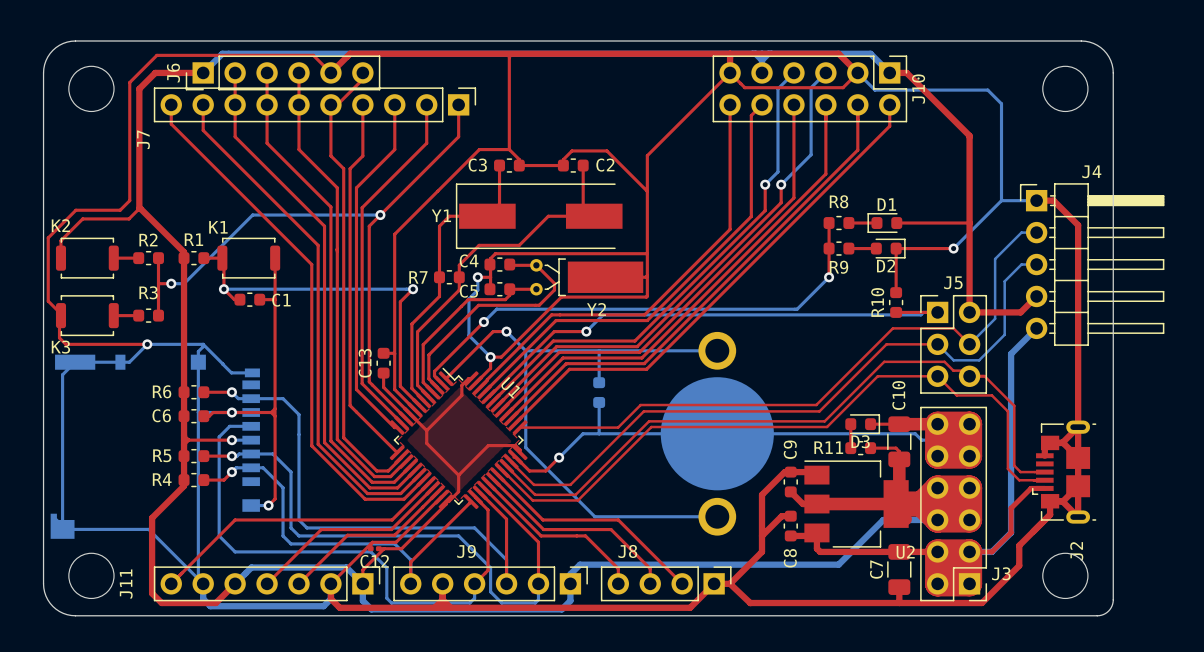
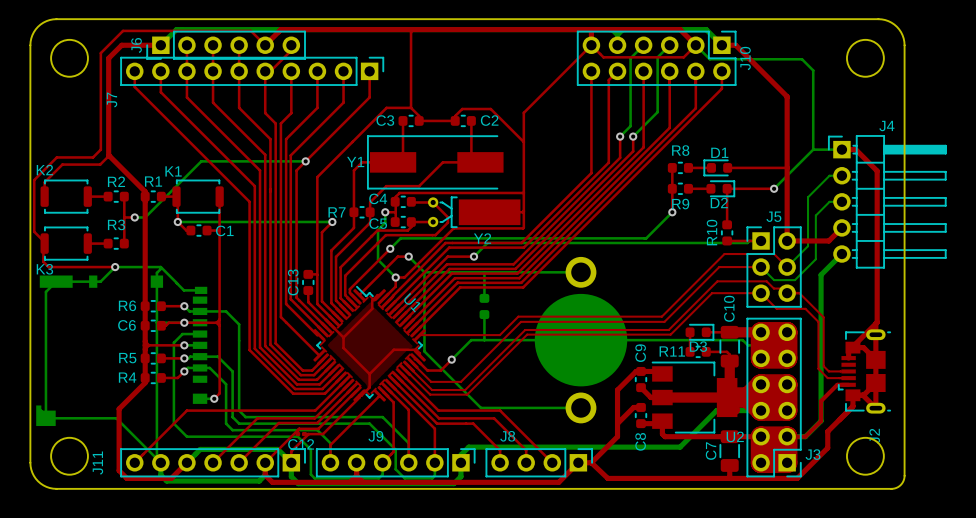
top track: (1078, 225) (1078, 413) -> (875, 169) (877, 322) (848, 350)
top track: (1078, 427) (1062, 442) -> none

